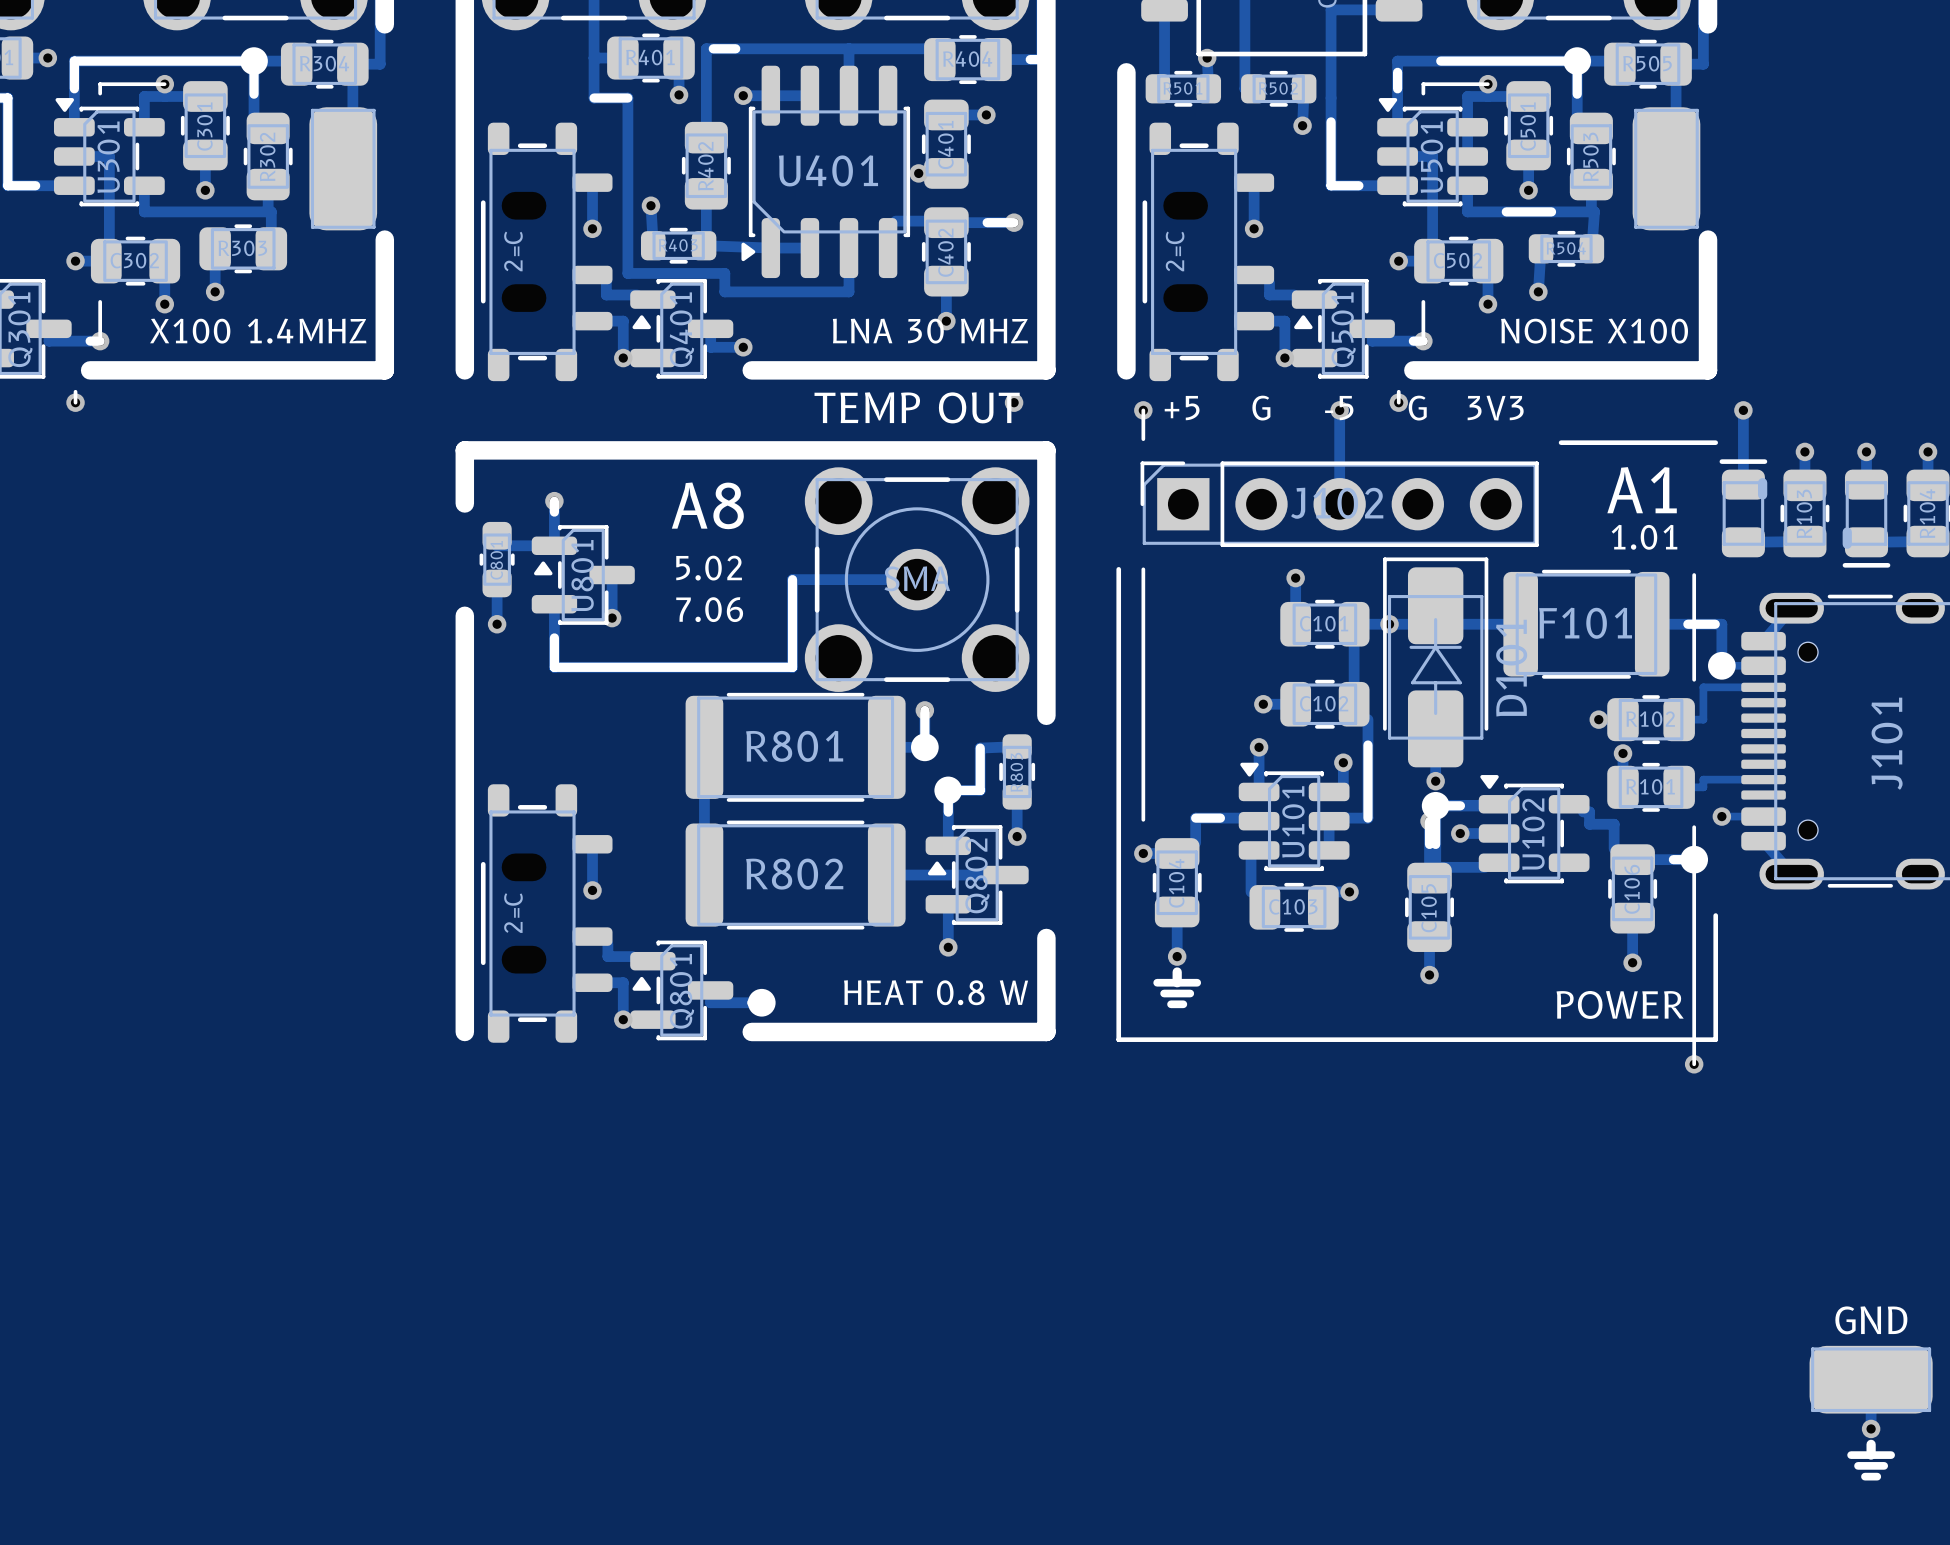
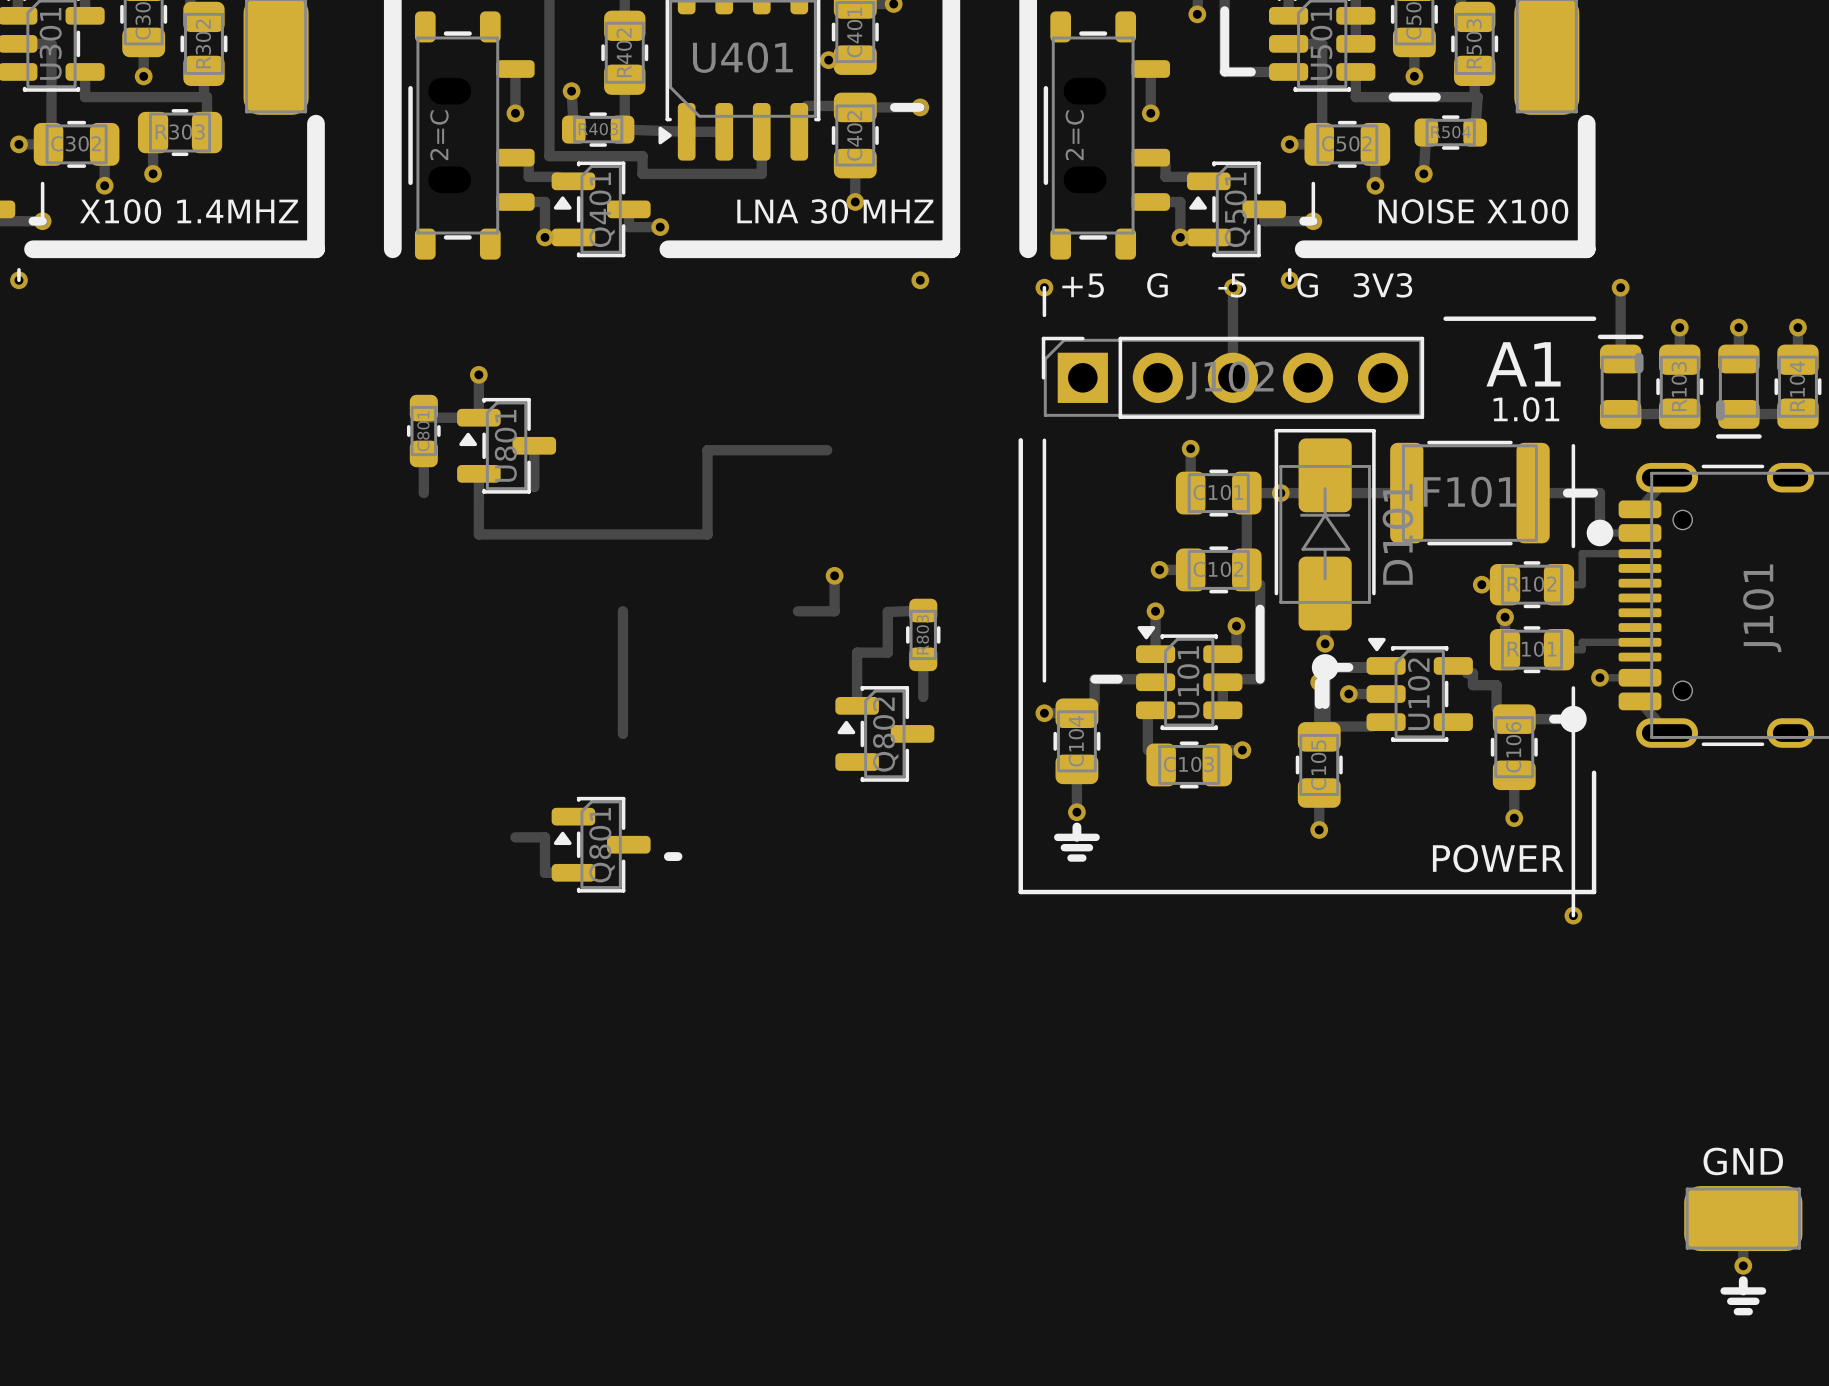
text: TEMP OUT (917, 407) -> none
line: (554, 501) (554, 512) -> none
line: (464, 503) (464, 450) (1046, 450) (1046, 715) -> none
text: A8 (707, 505) -> none
text: 5.02 (709, 568) -> none
line: (792, 579) (792, 667) (554, 667) (554, 637) -> none
part: (917, 579) -> none
text: 7.06 (709, 609) -> none
line: (464, 615) (464, 1031) -> none
via: (612, 618) -> none
via: (497, 624) -> none
line: (924, 710) (924, 747) -> none
drawing: [911, 733, 963, 805] -> none
R801: (795, 747) -> none
line: (980, 748) (980, 790) (948, 790) (948, 812) -> none
via: (1017, 836) -> none
track: (592, 844) (592, 890) -> none
R802: (795, 875) -> none
track: (886, 875) (1006, 875) -> none
via: (592, 890) -> none
track: (948, 904) (948, 947) -> none
part: (546, 913) -> none
line: (1046, 937) (1046, 1031) (751, 1031) -> none
track: (607, 944) (607, 956) (632, 956) -> none
via: (948, 947) -> none
drawing: [747, 988, 776, 1017] -> none
track: (710, 990) (710, 1002) (761, 1002) -> none
text: HEAT 0.8 W (936, 992) -> none
via: (623, 1019) -> none

